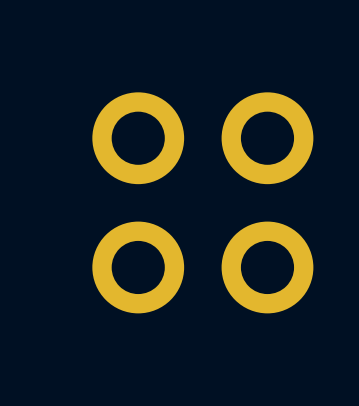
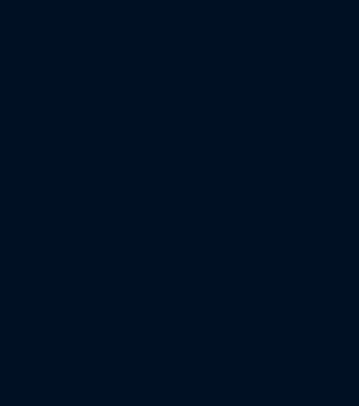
part: (138, 138) -> none
part: (267, 138) -> none
part: (138, 267) -> none
part: (267, 267) -> none

